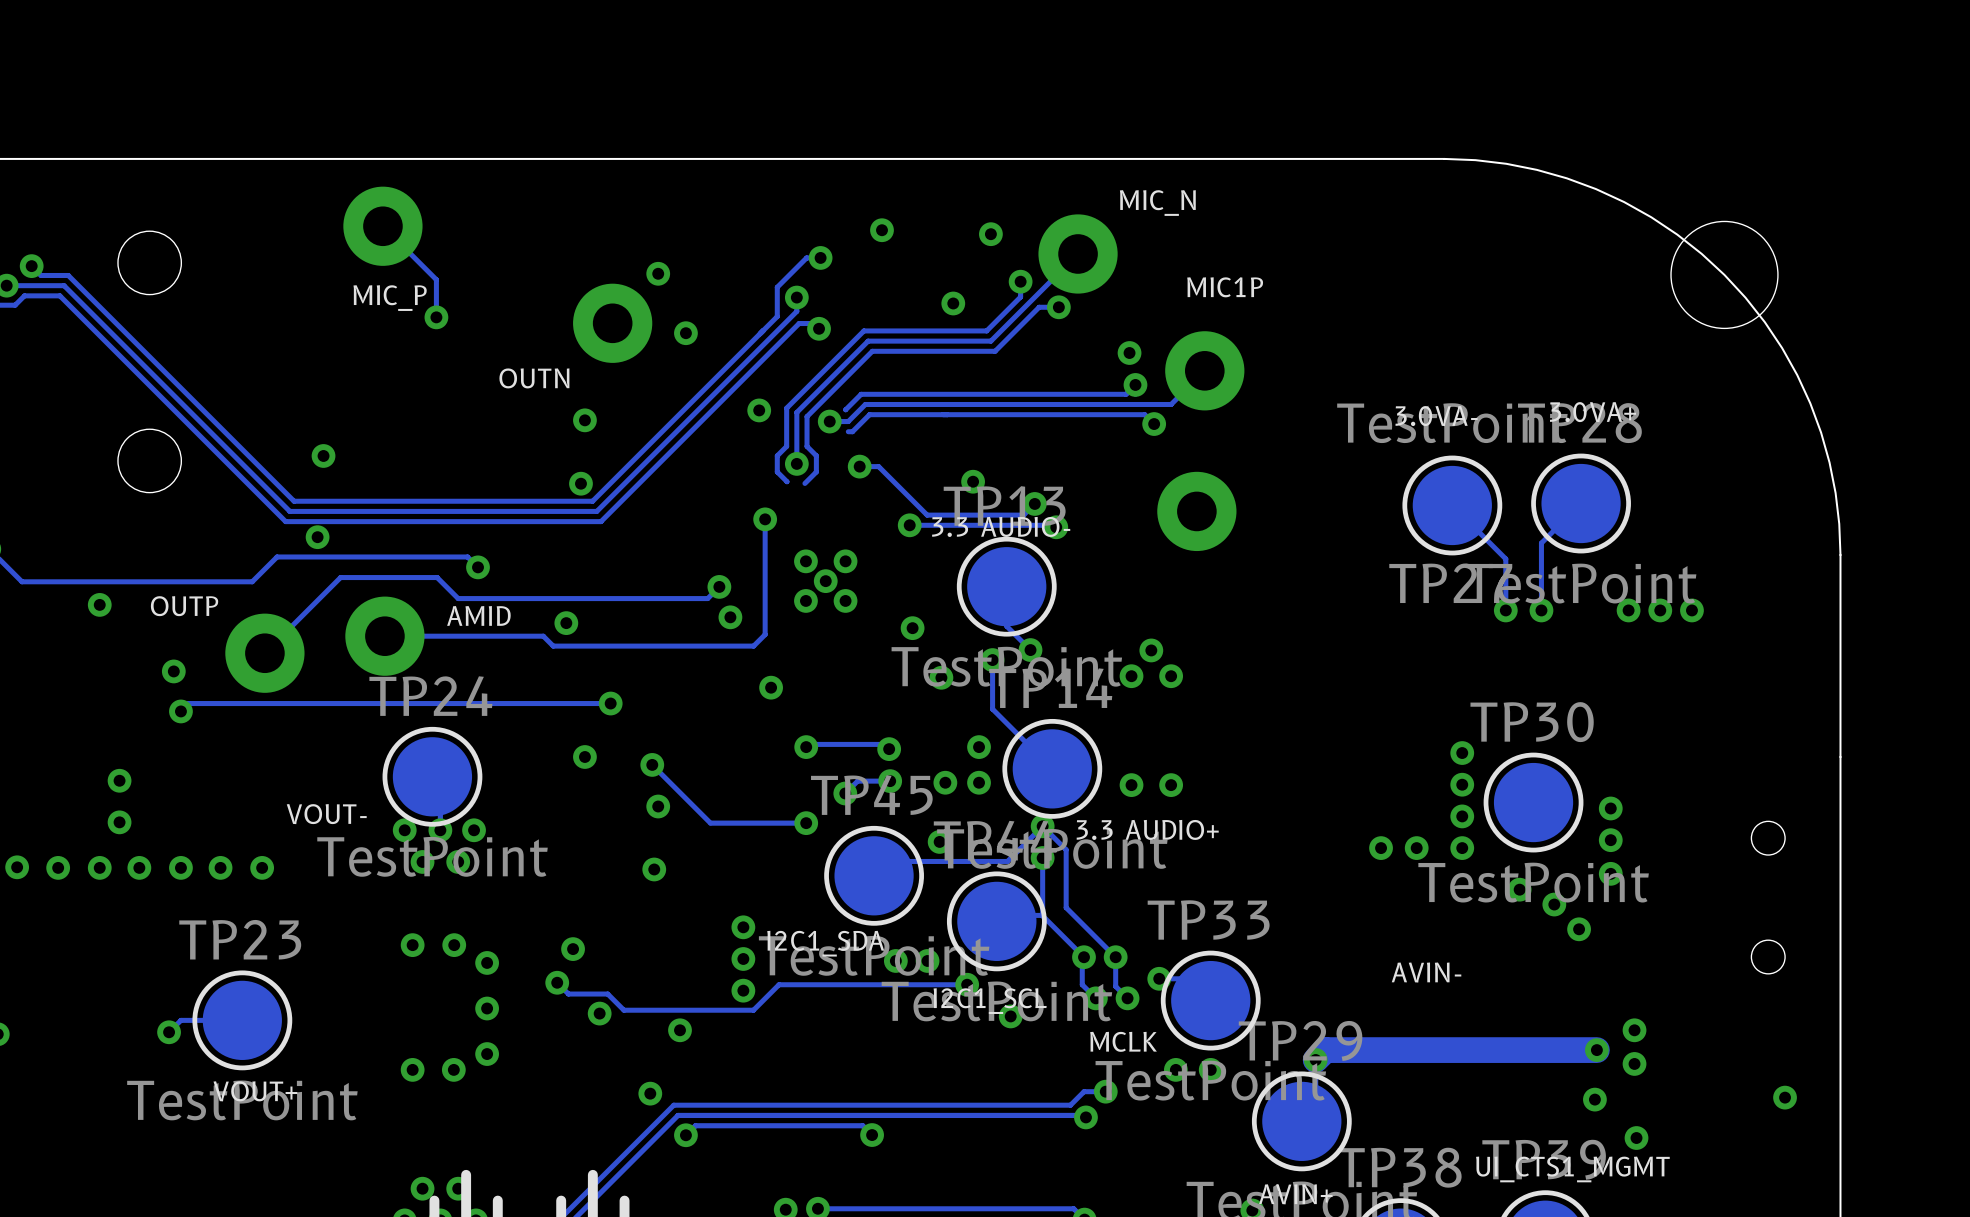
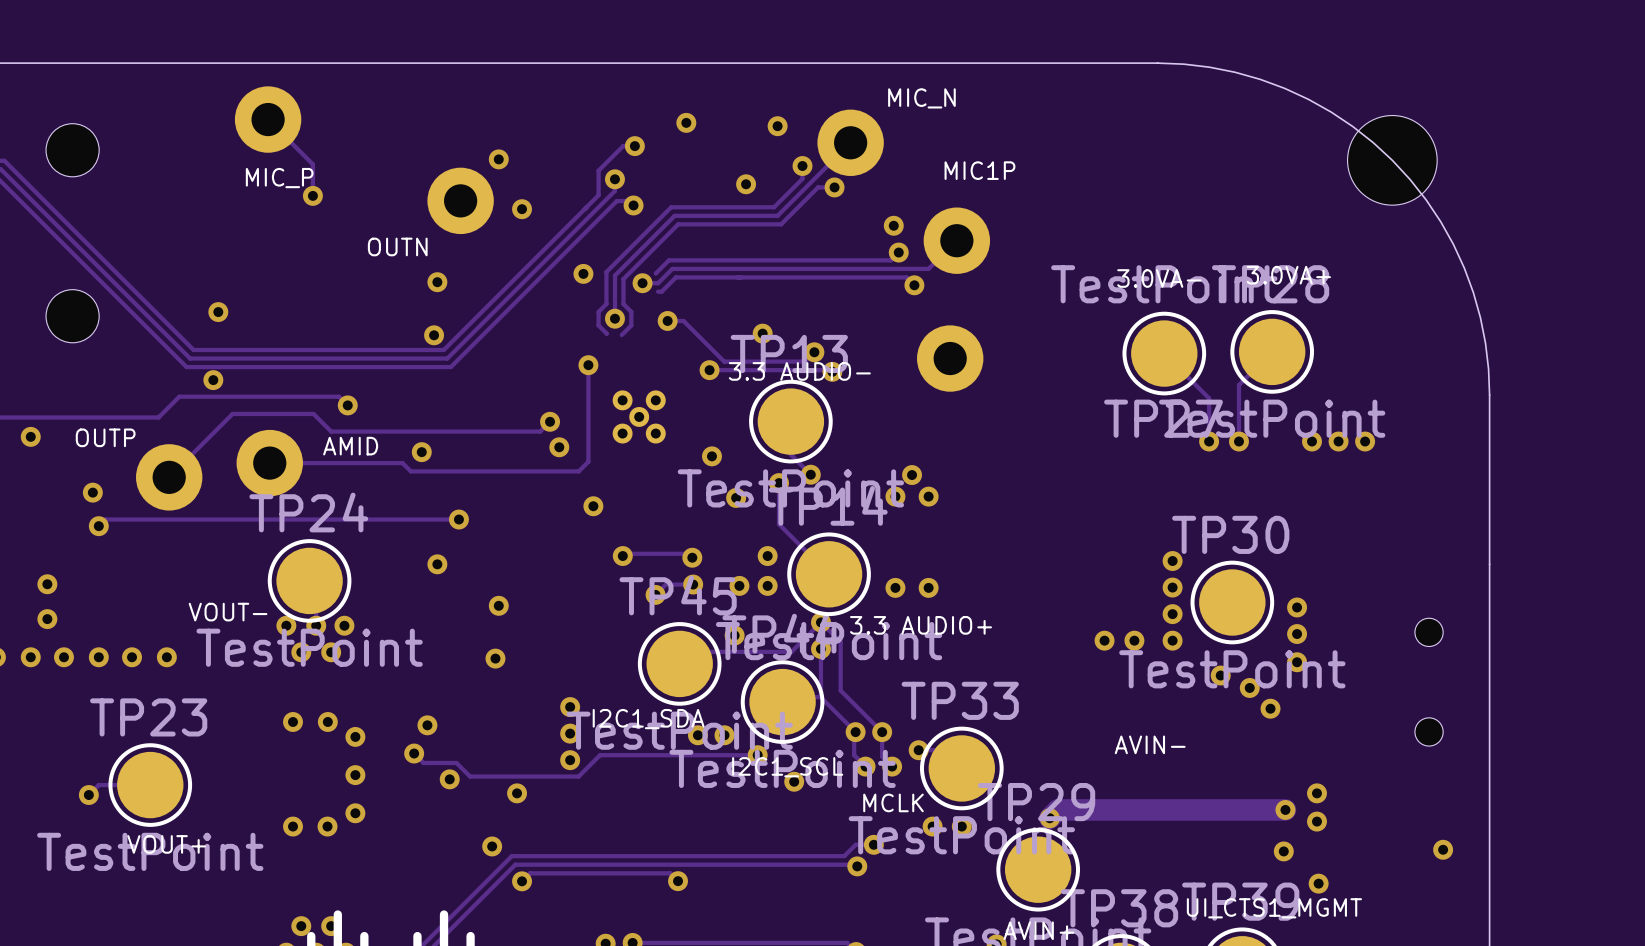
track: (652, 764) (710, 823) (806, 823) -> none
via: (652, 764) -> none
via: (806, 823) -> none

